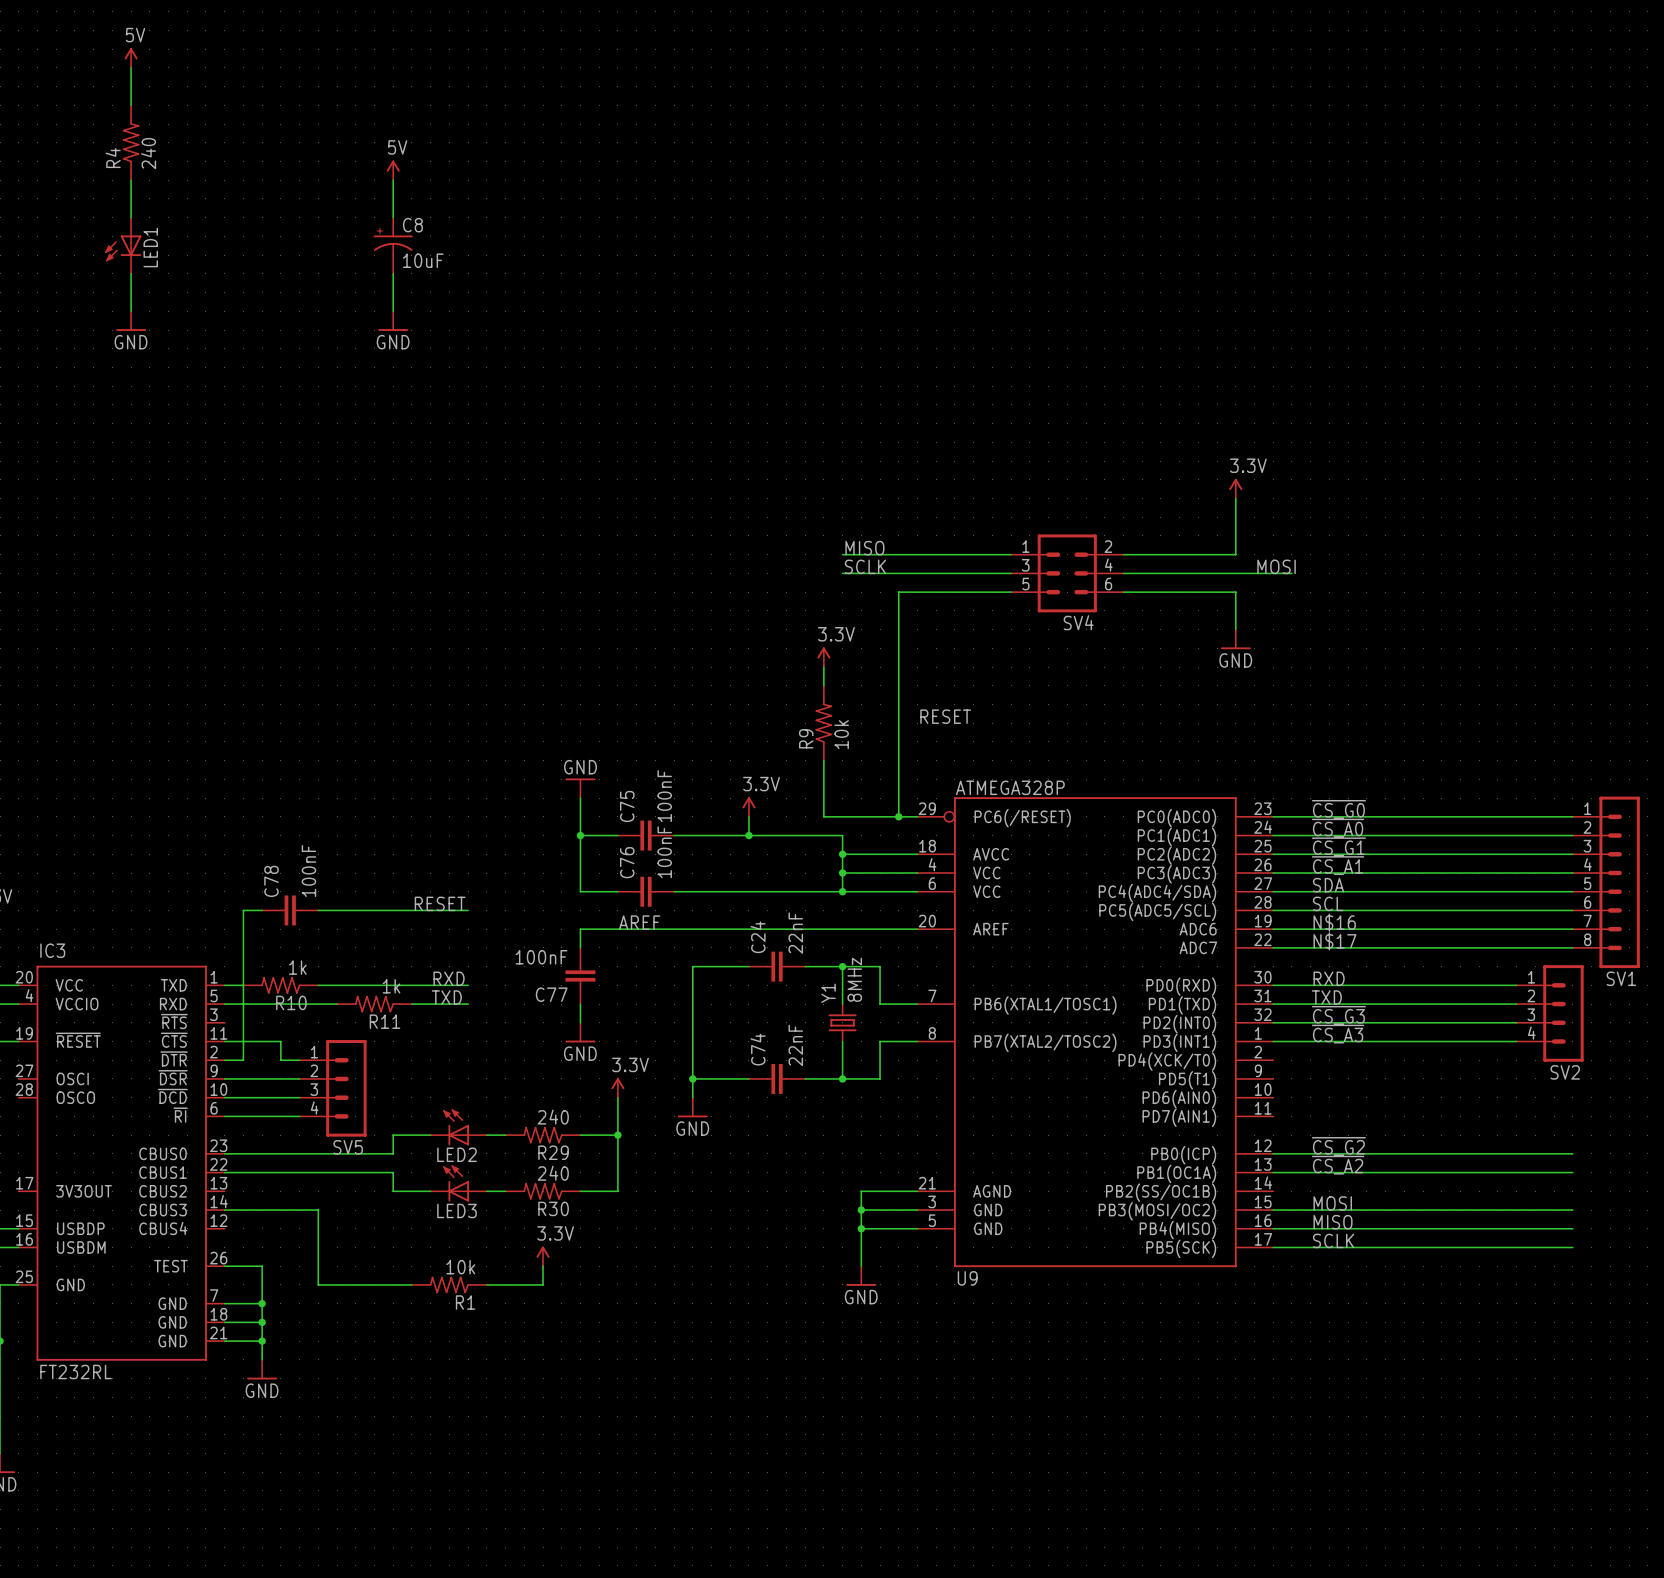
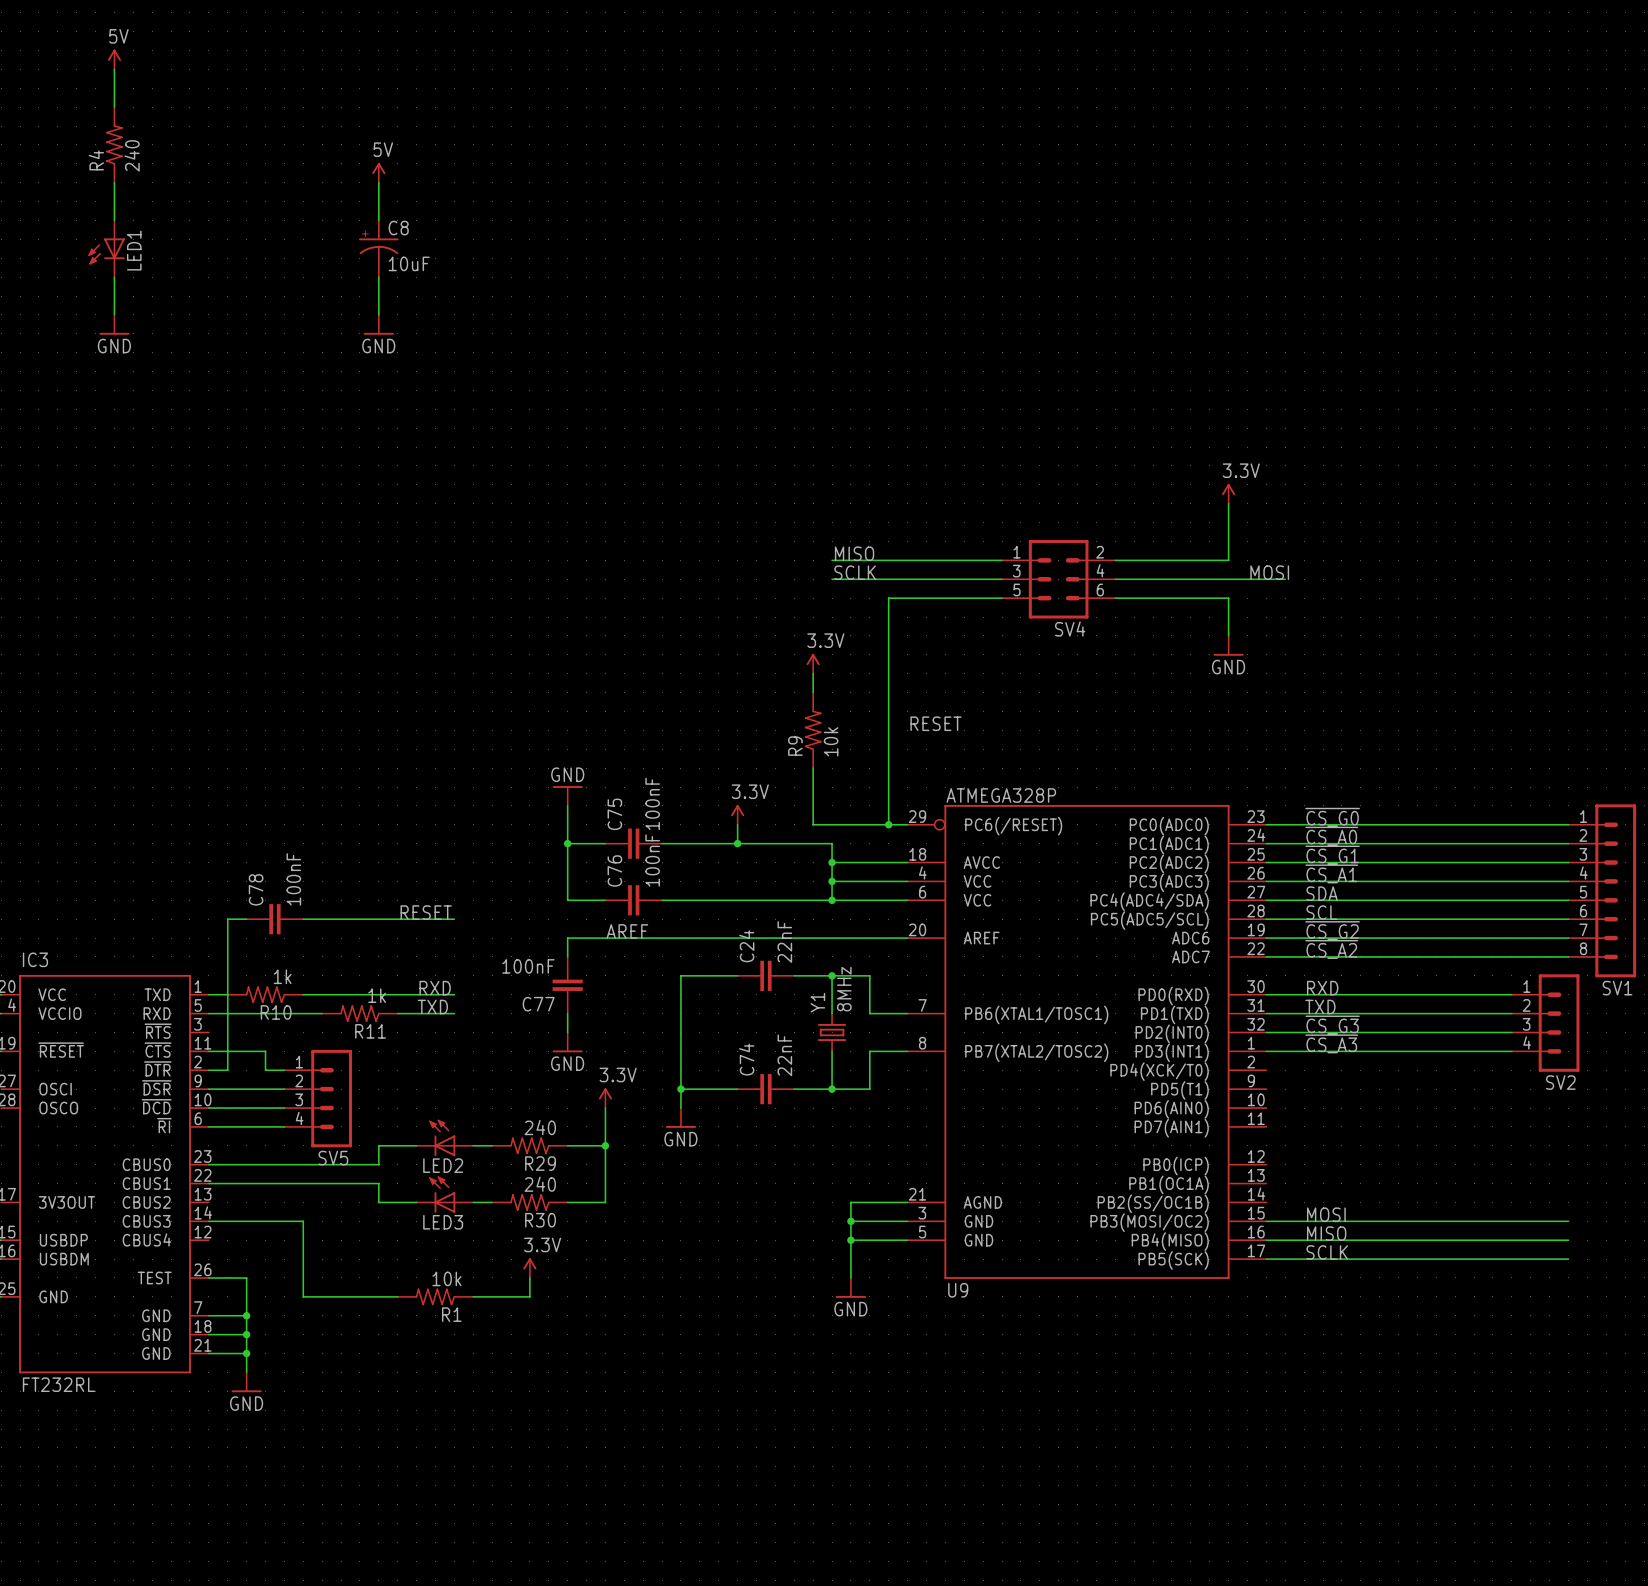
label: N$16 (1334, 922) -> ~{CS_G2} (1332, 930)
label: N$17 (1334, 941) -> ~{CS_A2} (1331, 949)
label: ~{CS_G2} (1338, 1146) -> none
wire: (1273, 1153) (1572, 1153) -> none
label: ~{CS_A2} (1338, 1165) -> none
wire: (1273, 1172) (1572, 1172) -> none

